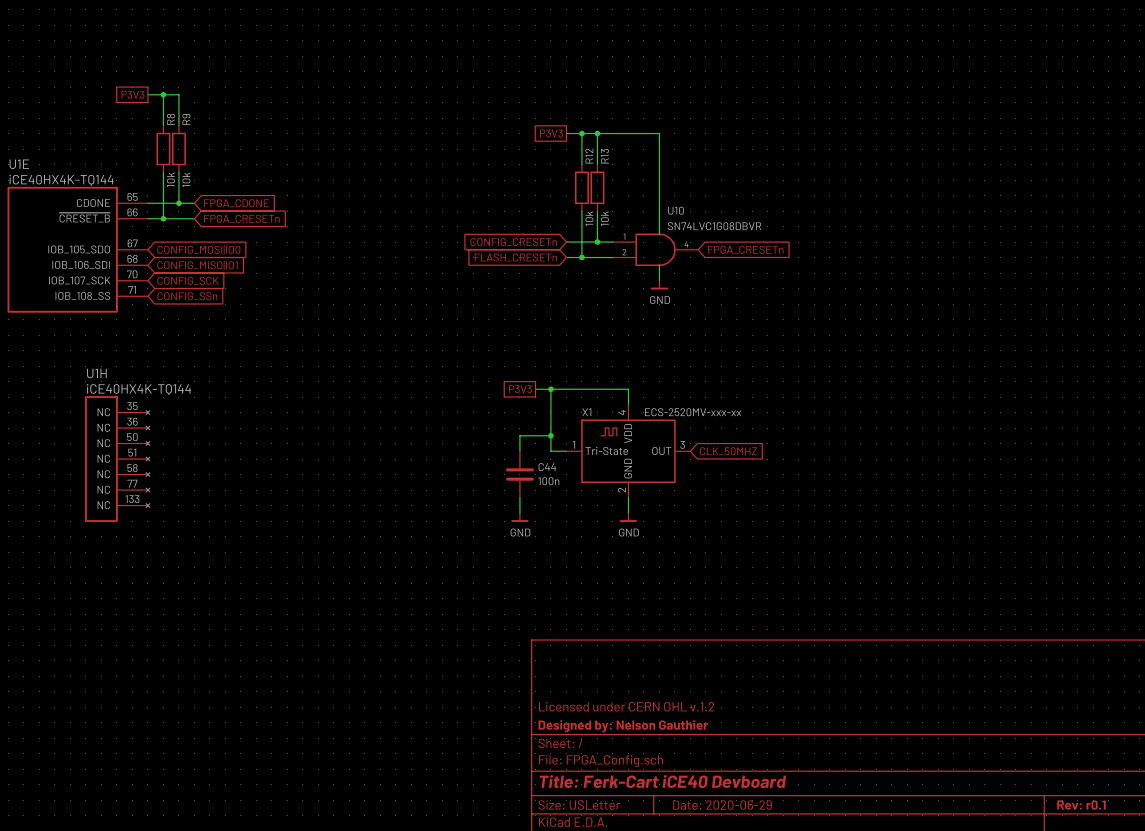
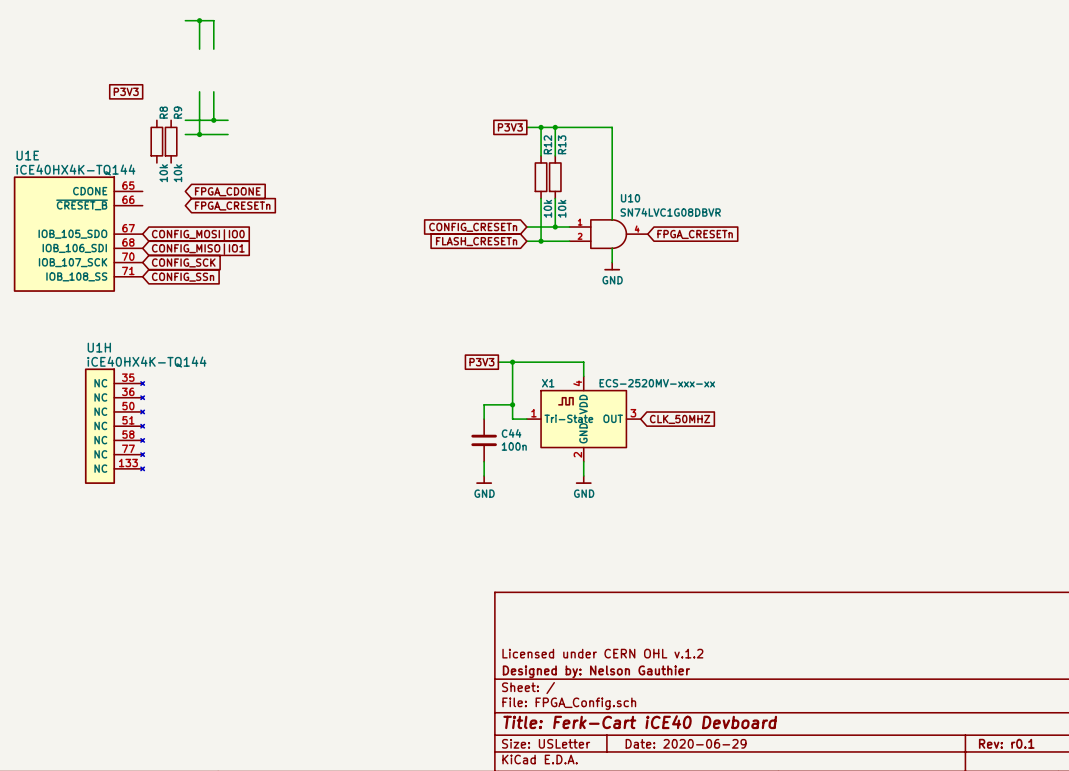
junction: none -> (199, 20)
wire: (147, 94) (178, 94) (178, 125) -> (185, 20) (213, 20) (213, 49)
wire: (163, 94) (163, 125) -> (199, 20) (199, 49)
junction: (163, 94) -> none
junction: none -> (213, 120)
junction: none -> (199, 134)
wire: (163, 172) (163, 218) -> (199, 91) (199, 134)
wire: (178, 172) (178, 203) -> (213, 91) (213, 120)
wire: (147, 203) (194, 203) -> (185, 120) (228, 120)
junction: (178, 203) -> none
wire: (147, 218) (194, 218) -> (185, 134) (228, 134)
junction: (163, 218) -> none

